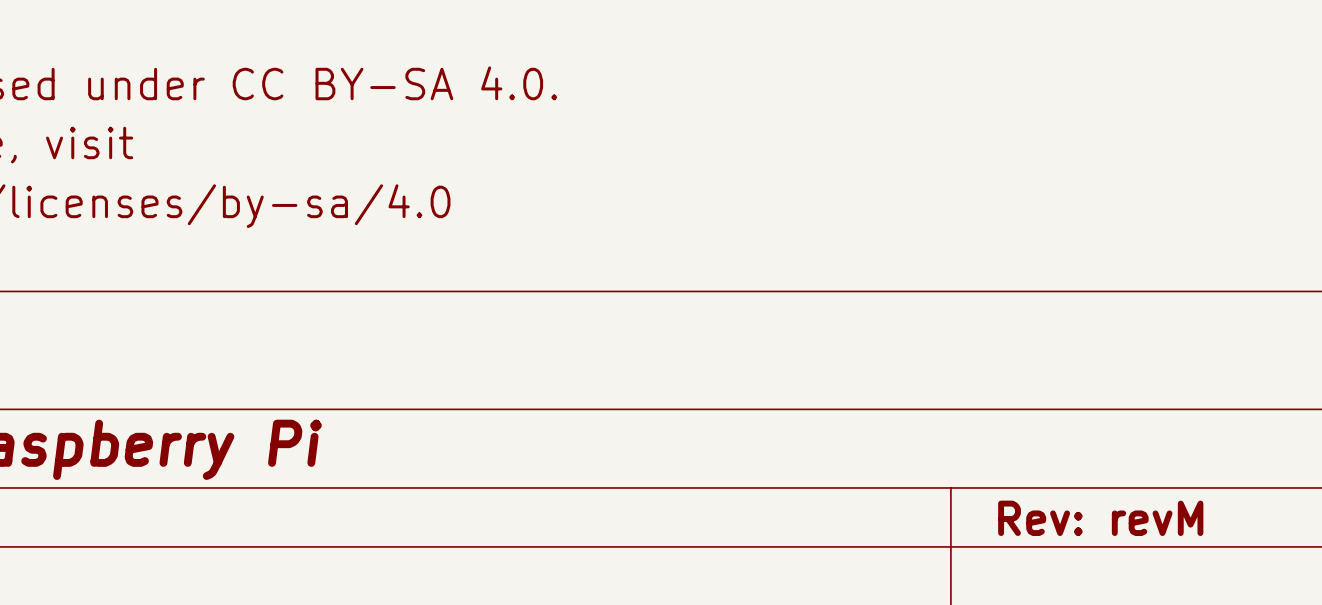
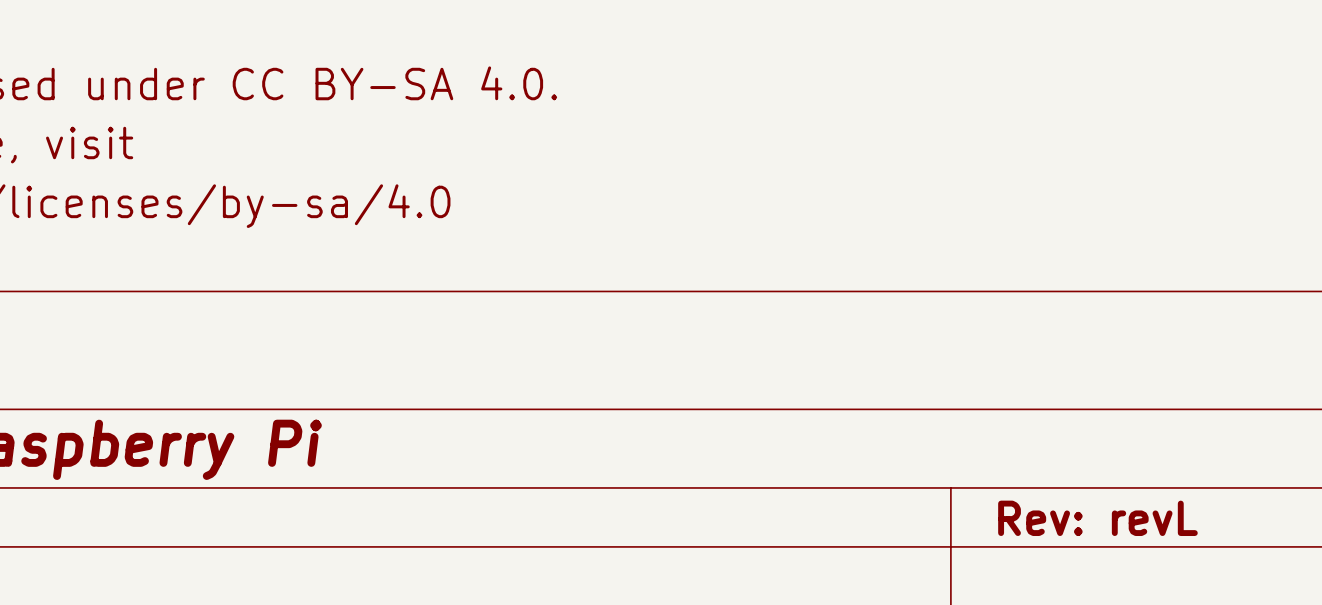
title block: Rev: revM (1100, 518) -> Rev: revL (1097, 518)

